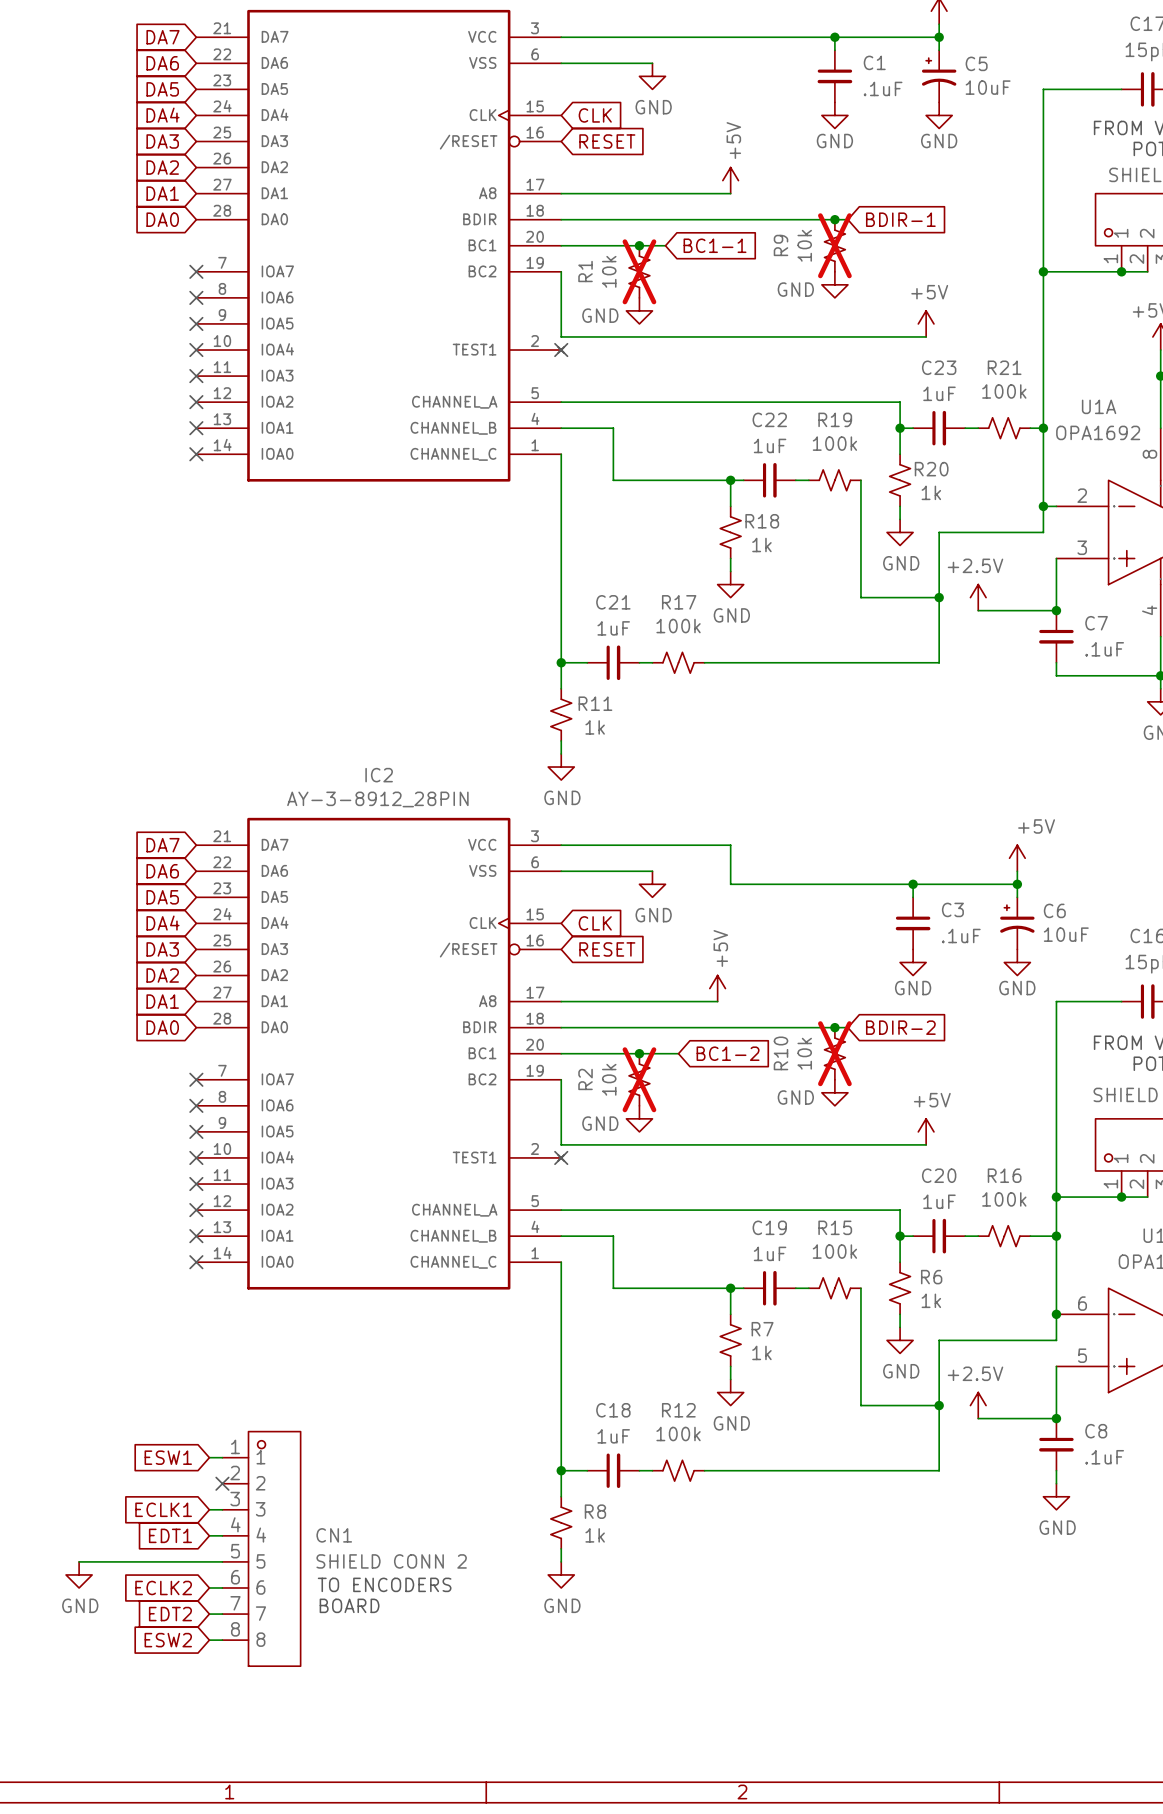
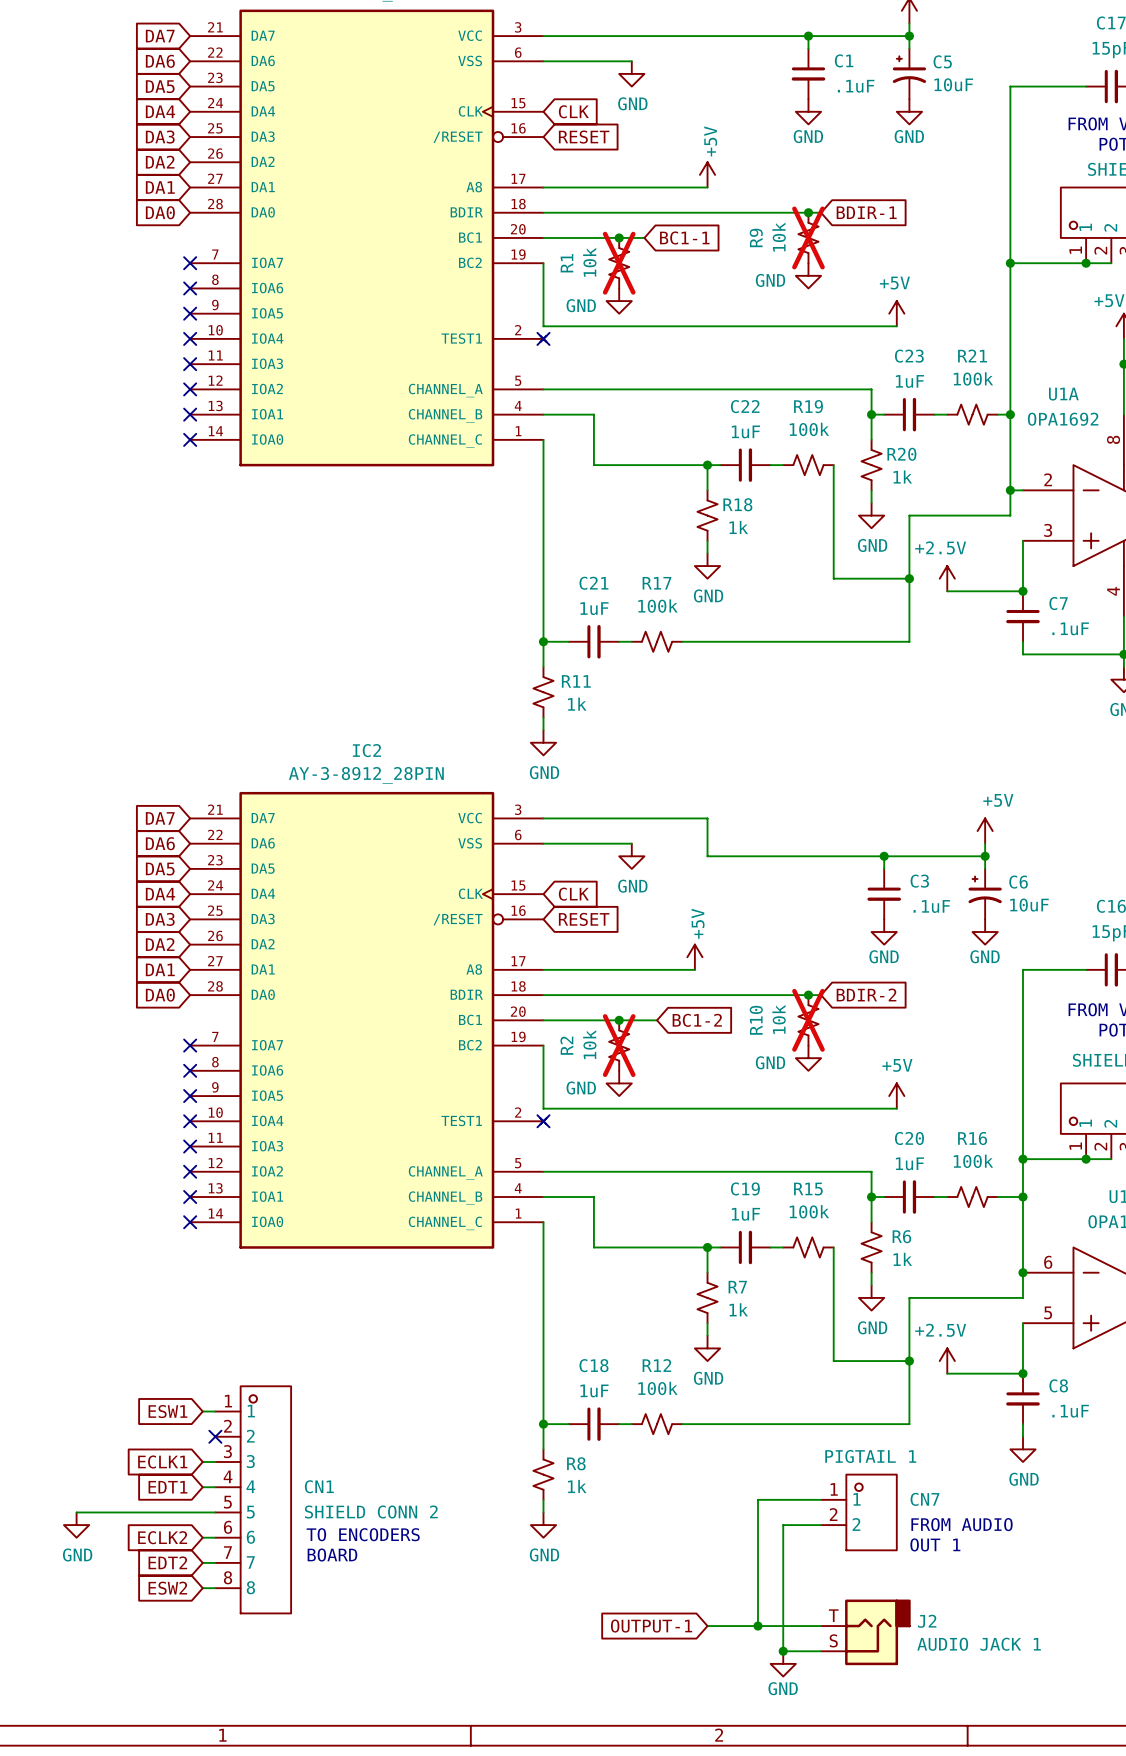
wire: none -> (821, 1499) (758, 1499) (758, 1626)
CN7: none -> PIGTAIL 1 (858, 1512)
wire: none -> (821, 1525) (783, 1525) (783, 1651) (821, 1651)
text: none -> FROM AUDIO (962, 1524)
text: none -> OUT 1 (935, 1544)
global label: none -> OUTPUT-1 (651, 1626)
wire: none -> (707, 1626) (821, 1626)
junction: none -> (758, 1626)
J2: none -> AUDIO JACK 1 (865, 1632)
junction: none -> (783, 1651)
power symbol: none -> GND (783, 1663)

